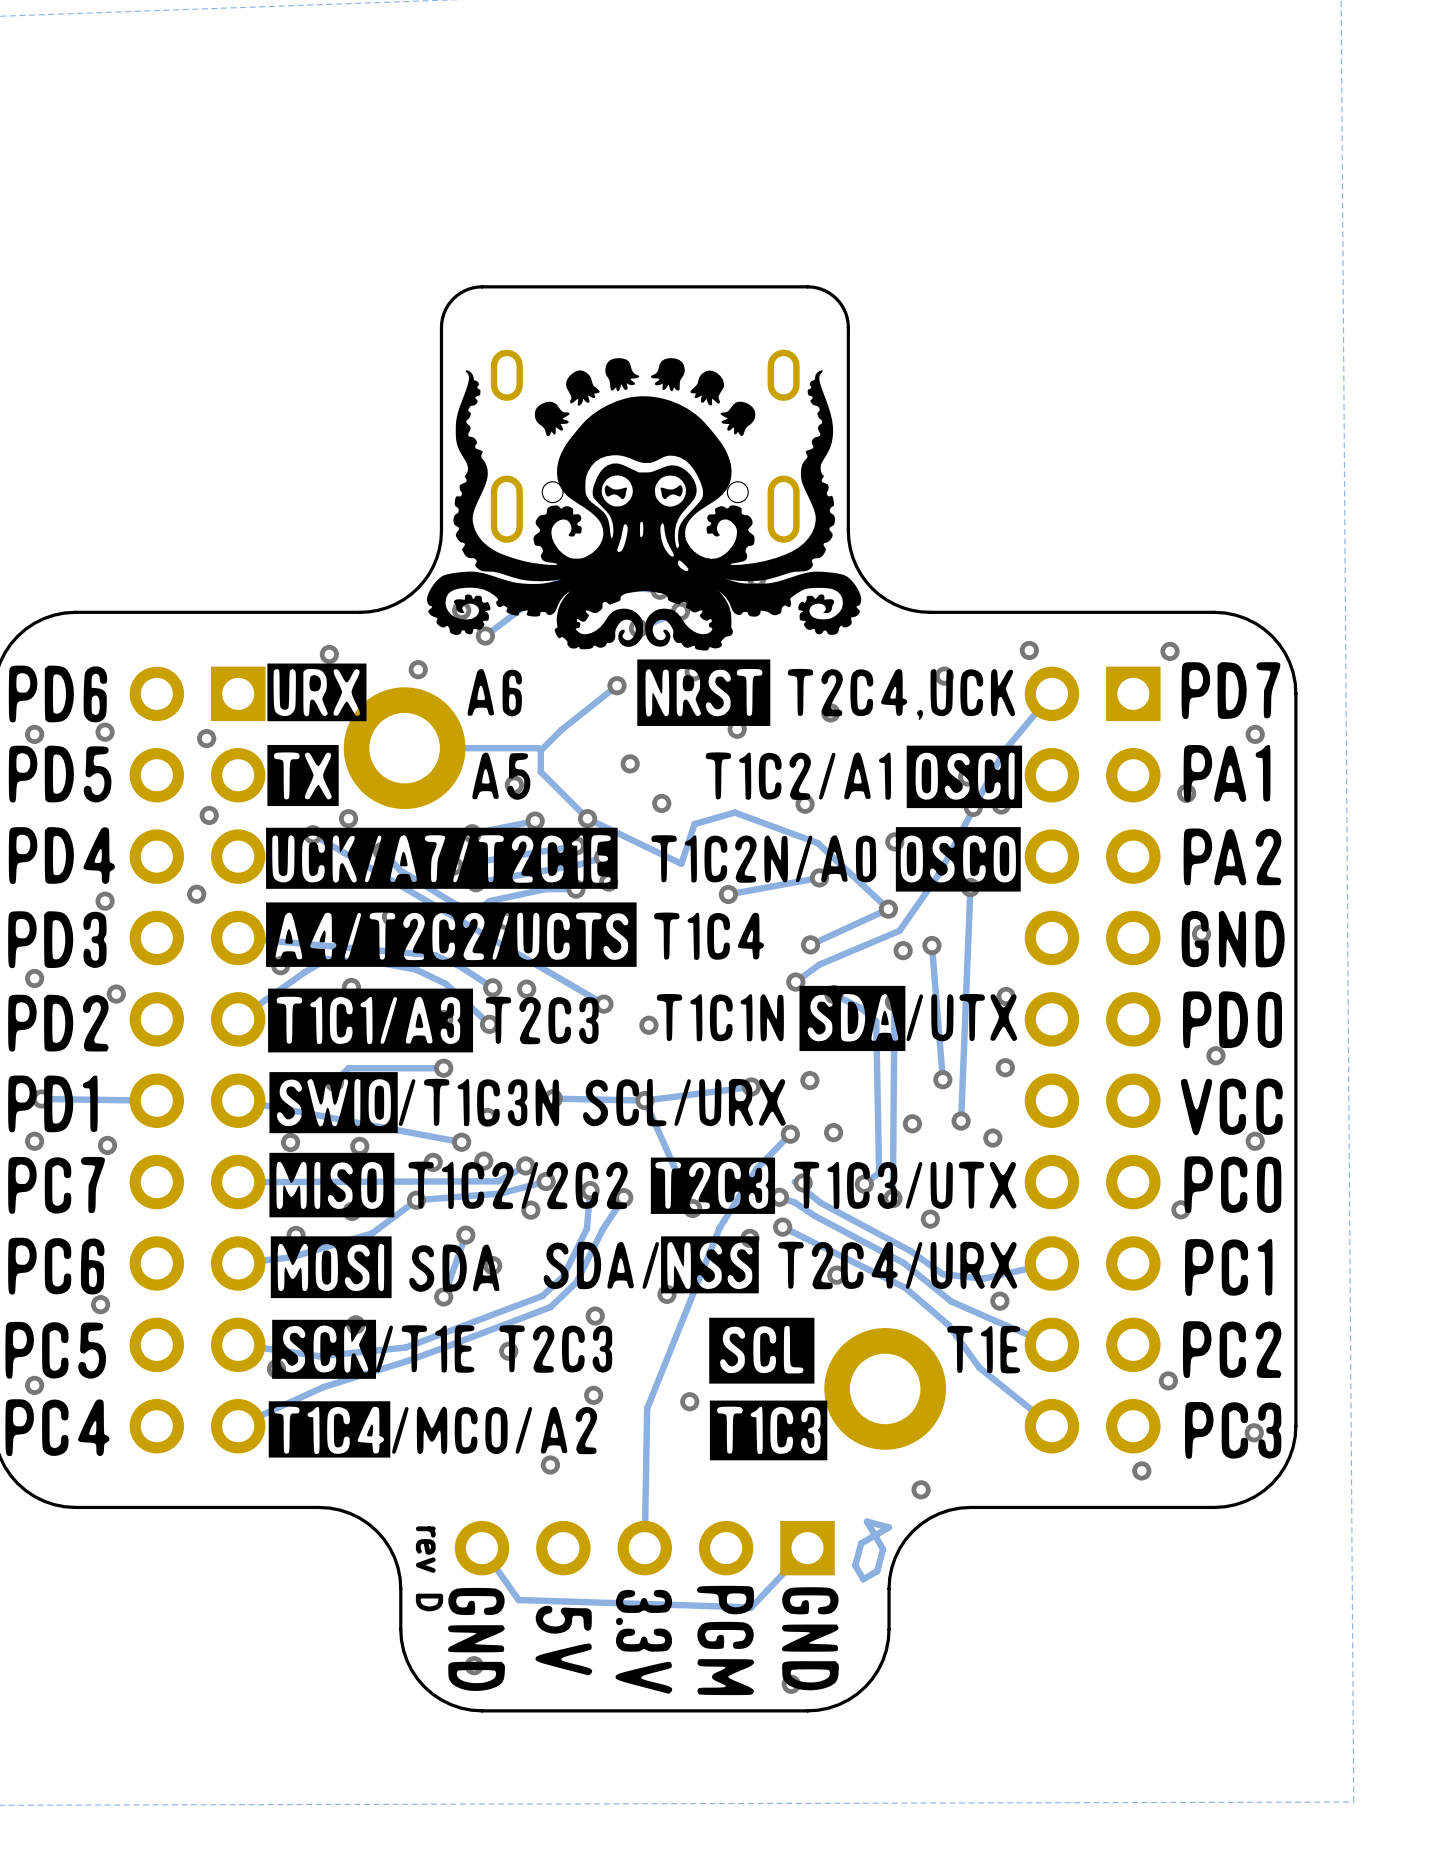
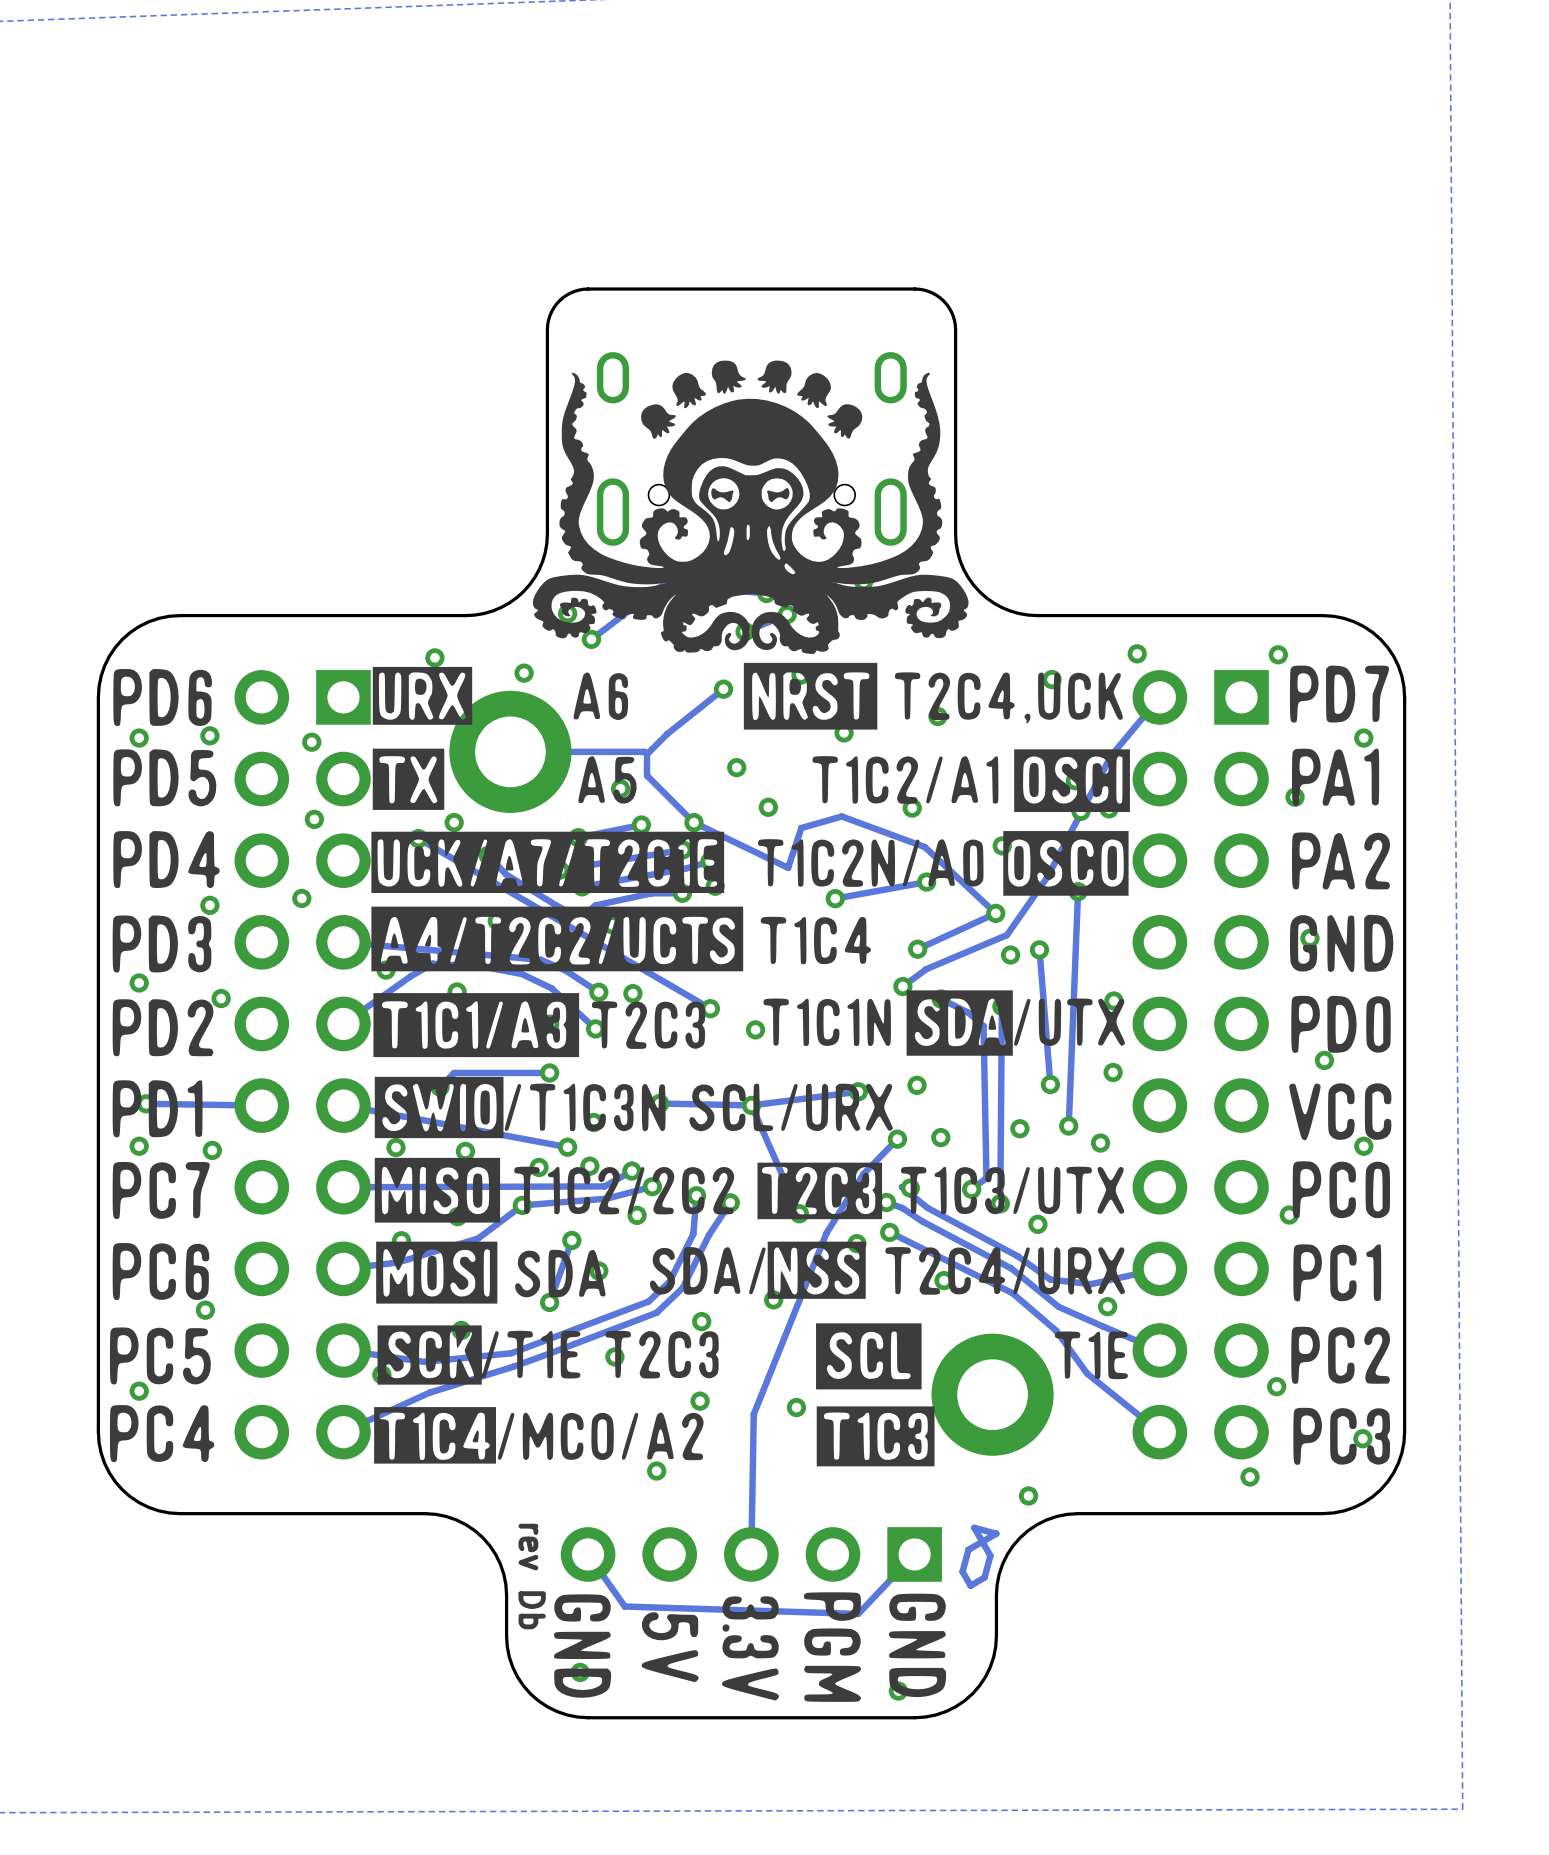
text: rev D (429, 1568) -> rev Db (532, 1576)

